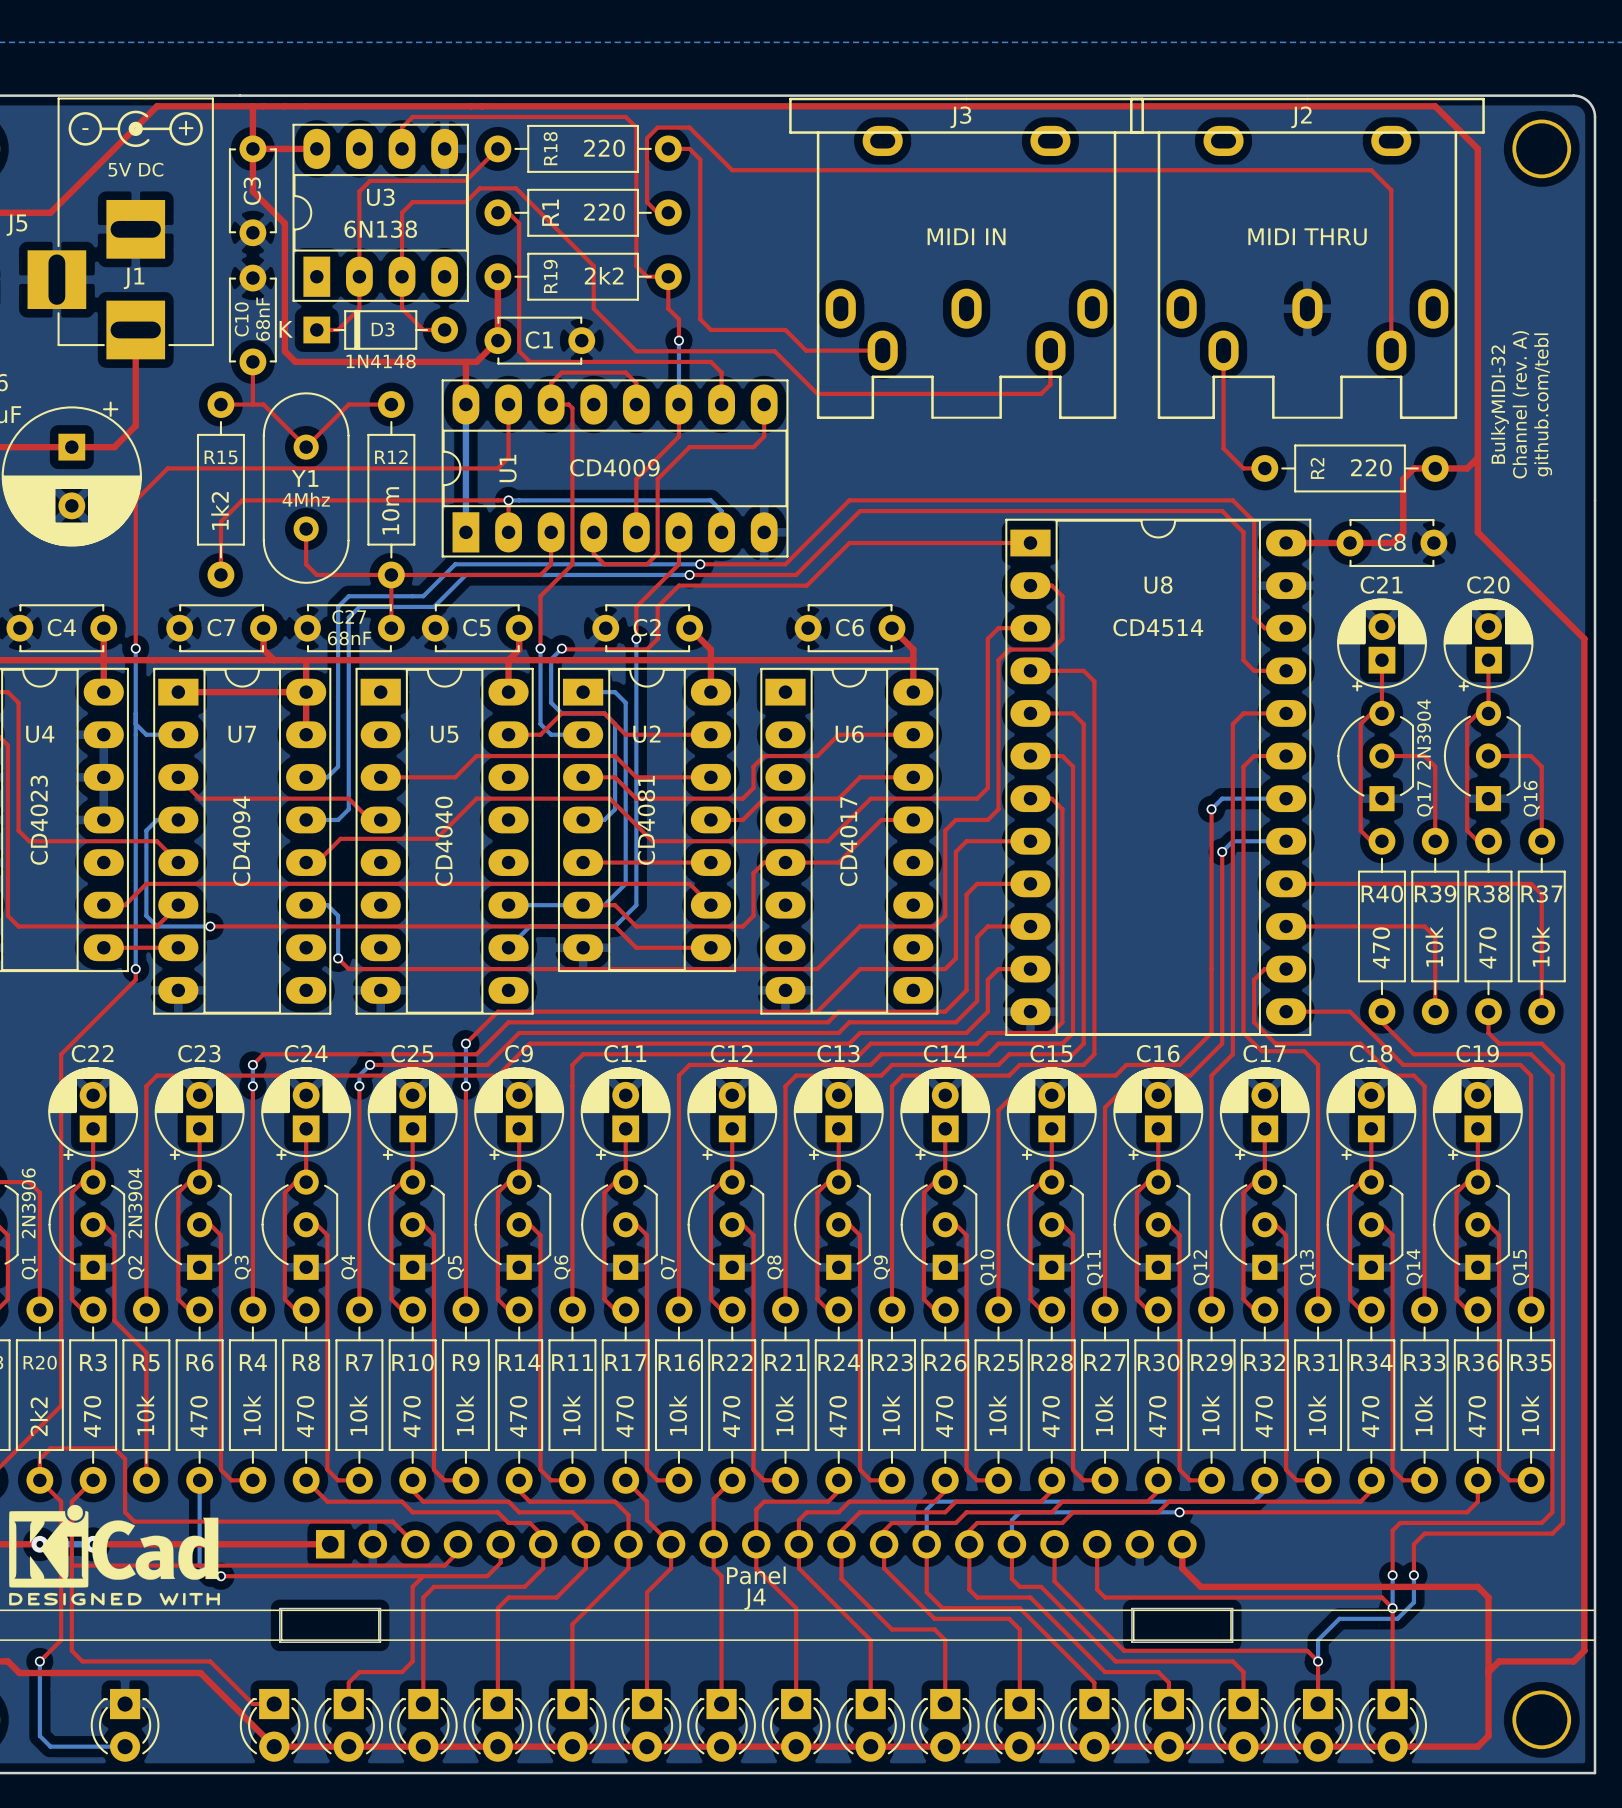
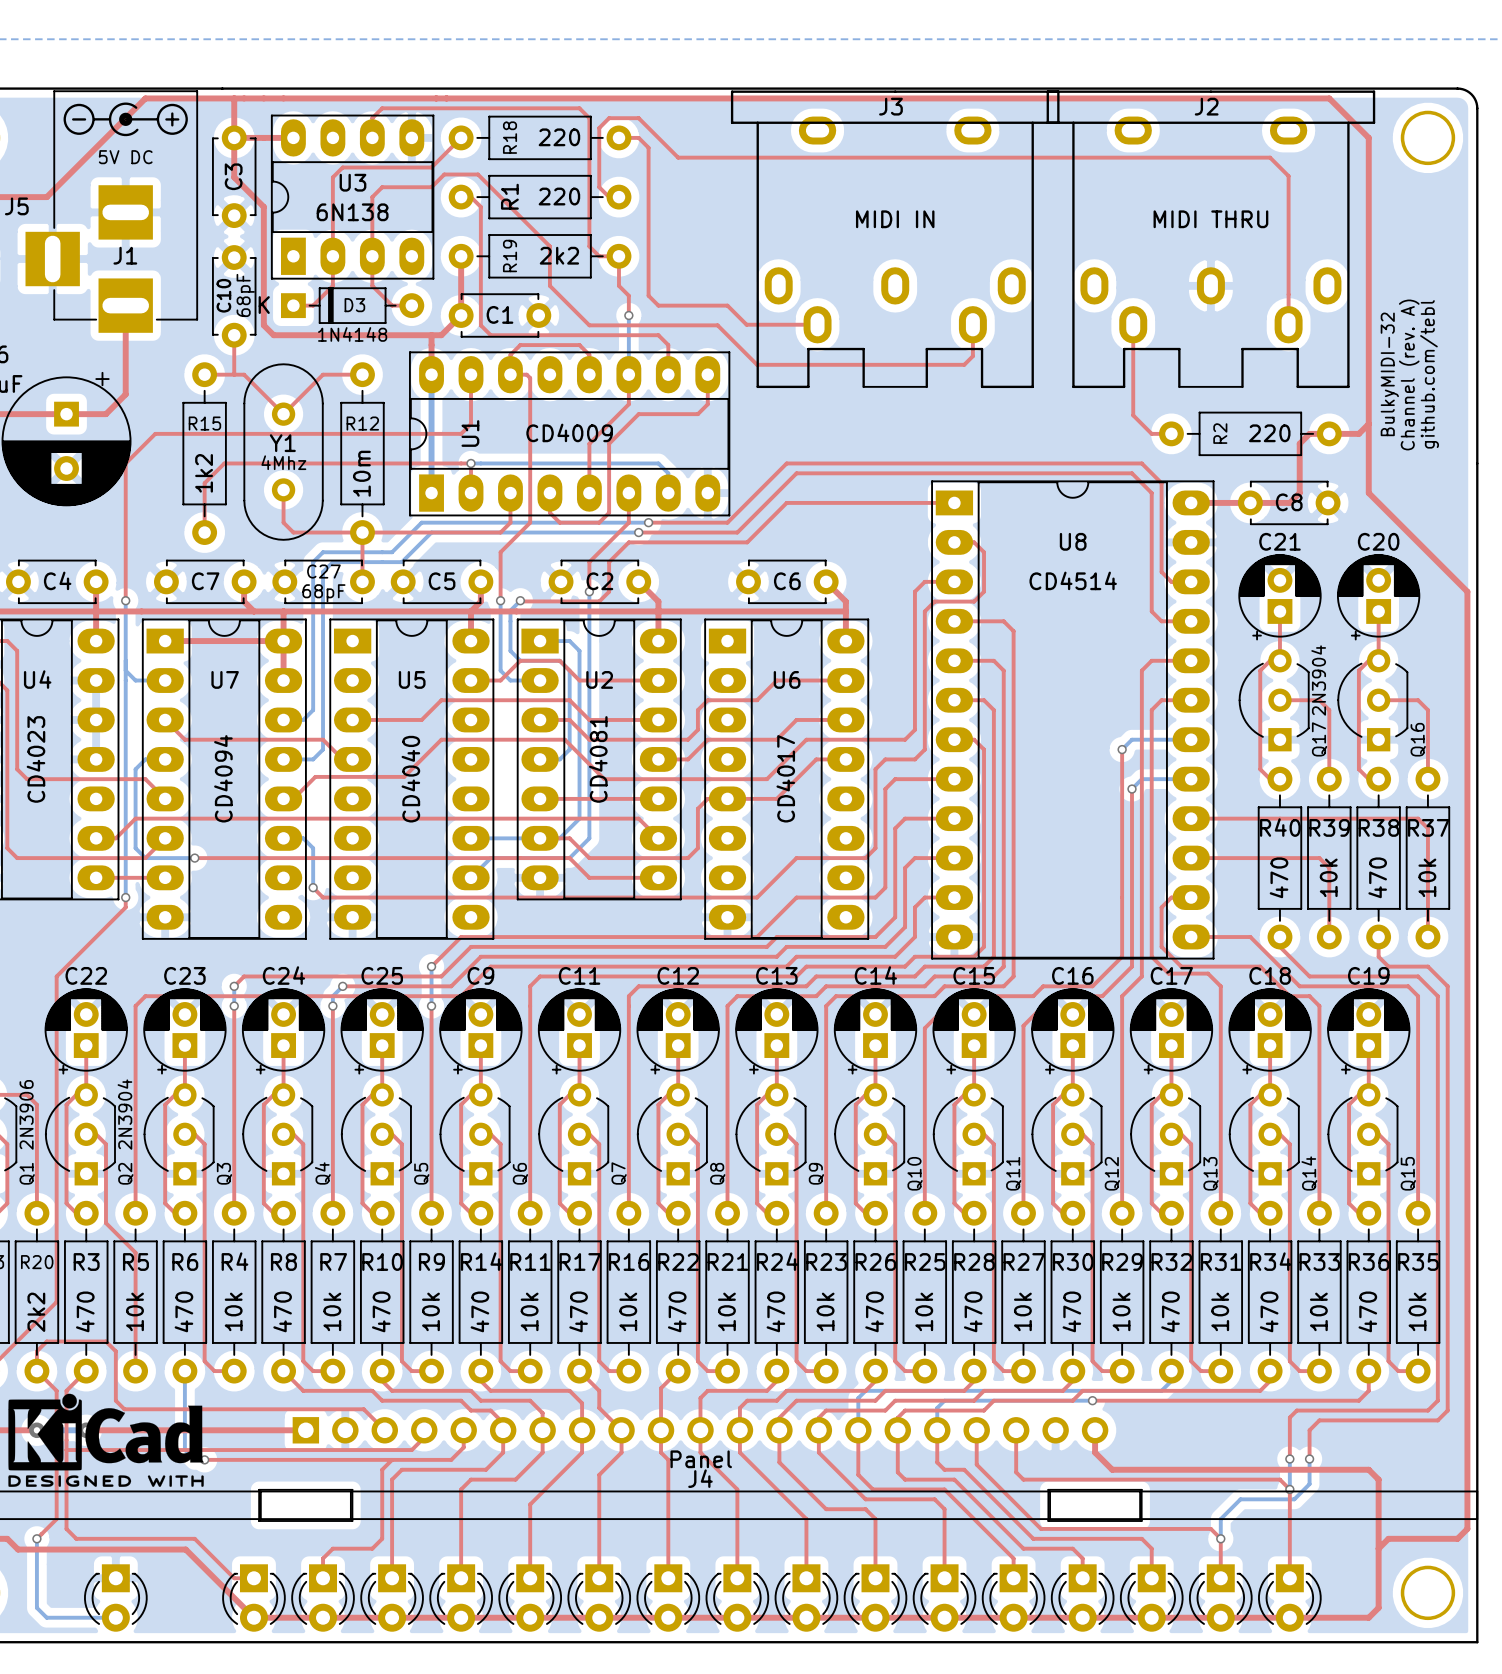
C10 value: 68nF (263, 319) -> 68pF (245, 295)
C27 value: 68nF (349, 638) -> 68pF (323, 593)

